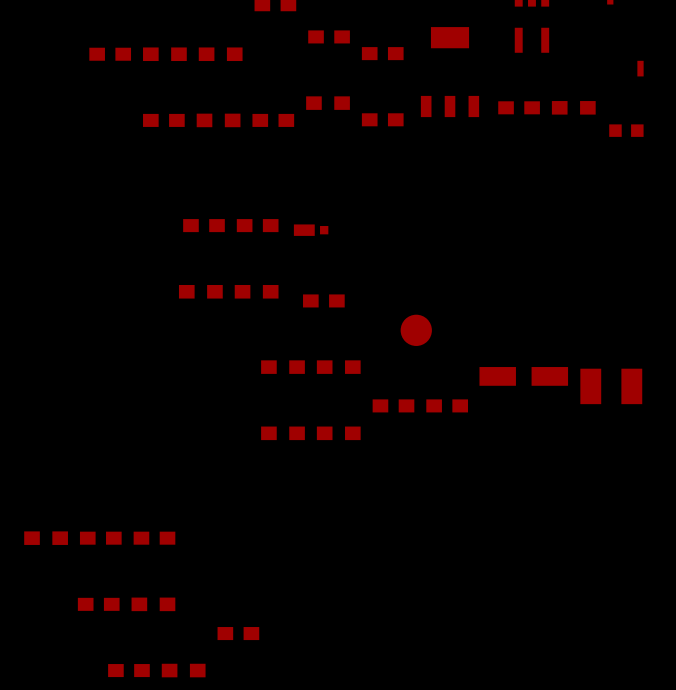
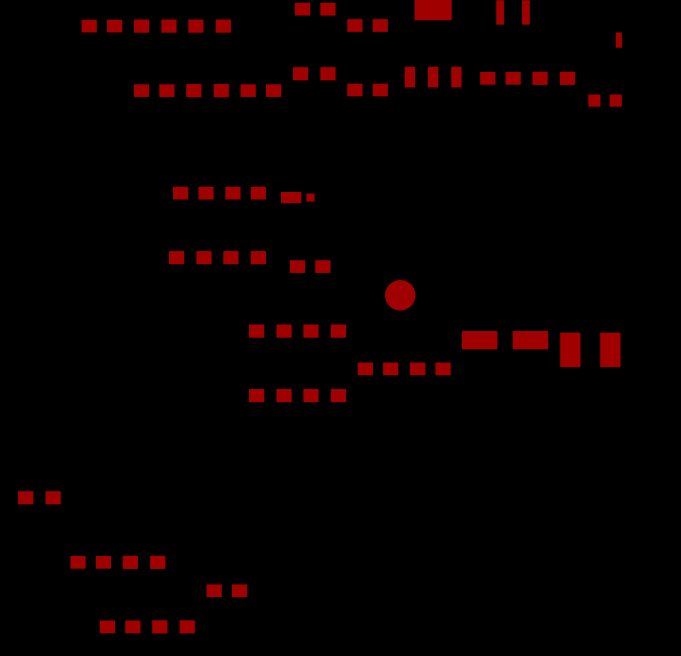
part: (100, 538) -> none
part: (154, 538) -> none

